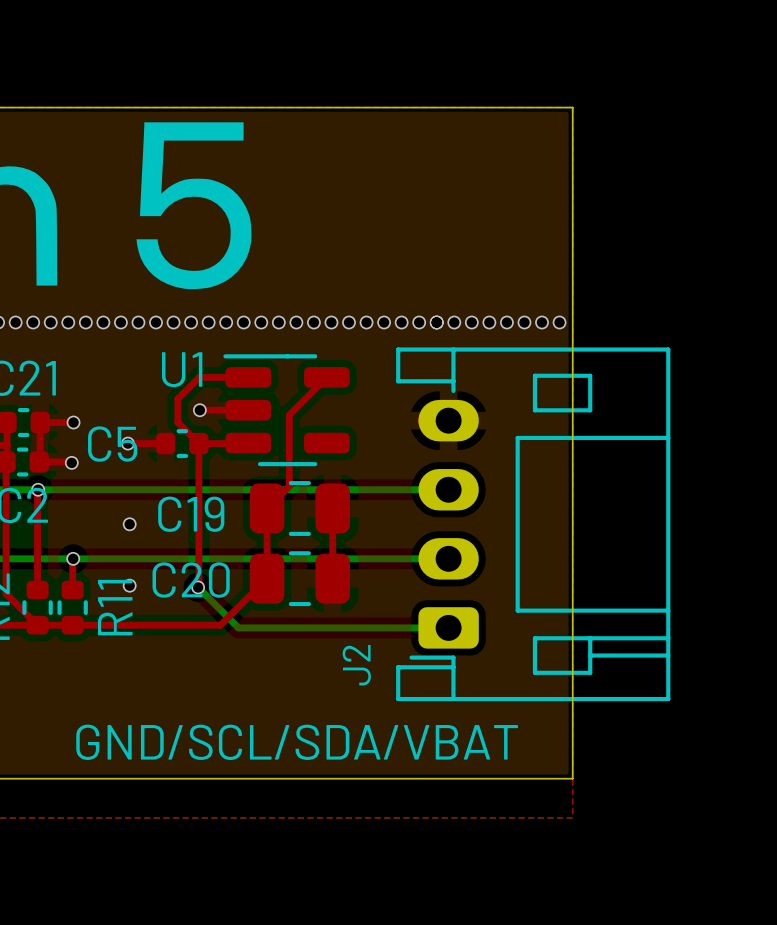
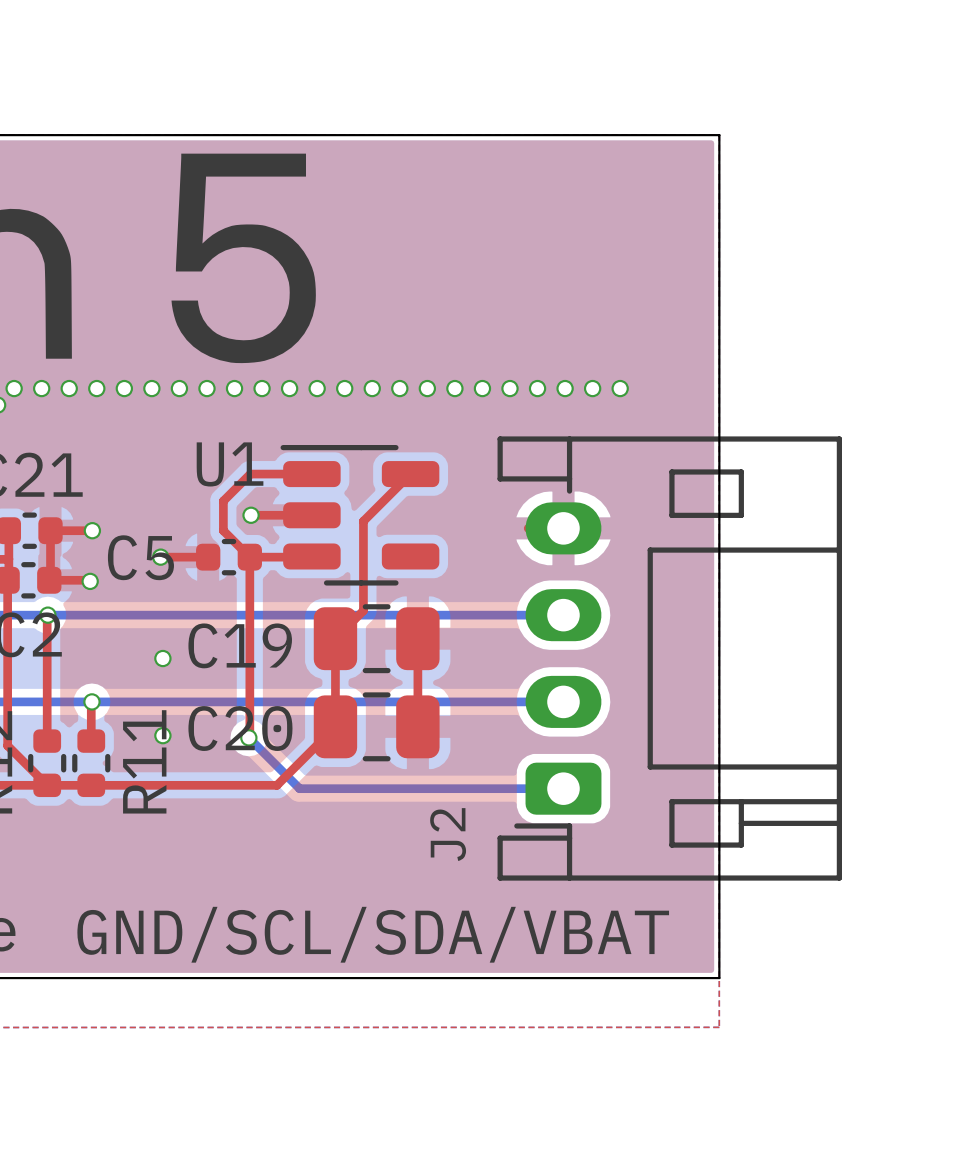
via: none -> (69, 388)
via: none -> (96, 388)
via: none -> (124, 388)
via: none -> (179, 388)
via: none -> (206, 388)
via: none -> (234, 388)
via: none -> (289, 388)
via: none -> (317, 388)
via: none -> (344, 388)
via: none -> (399, 388)
via: none -> (427, 388)
via: none -> (454, 388)
via: none -> (509, 388)
via: none -> (537, 388)
via: none -> (565, 388)
via: none -> (620, 388)
via position: (15, 322) -> (14, 388)
via position: (33, 322) -> (41, 388)
via: (50, 322) -> none
via: (68, 322) -> none
via: (85, 322) -> none
via: (103, 322) -> none
via position: (120, 322) -> (151, 388)
via: (138, 322) -> none
via: (156, 322) -> none
via: (173, 322) -> none
via: (191, 322) -> none
via position: (208, 322) -> (262, 388)
via: (226, 322) -> none
via: (243, 322) -> none
via: (261, 322) -> none
via: (278, 322) -> none
via position: (296, 322) -> (372, 388)
via: (313, 322) -> none
via: (331, 322) -> none
via: (349, 322) -> none
via: (366, 322) -> none
via position: (384, 322) -> (482, 388)
via: (401, 322) -> none
via: (419, 322) -> none
via: (436, 322) -> none
via: (454, 322) -> none
via position: (471, 322) -> (592, 388)
via: (489, 322) -> none
via: (506, 322) -> none
via: (524, 322) -> none
via: (542, 322) -> none
via: (559, 322) -> none

